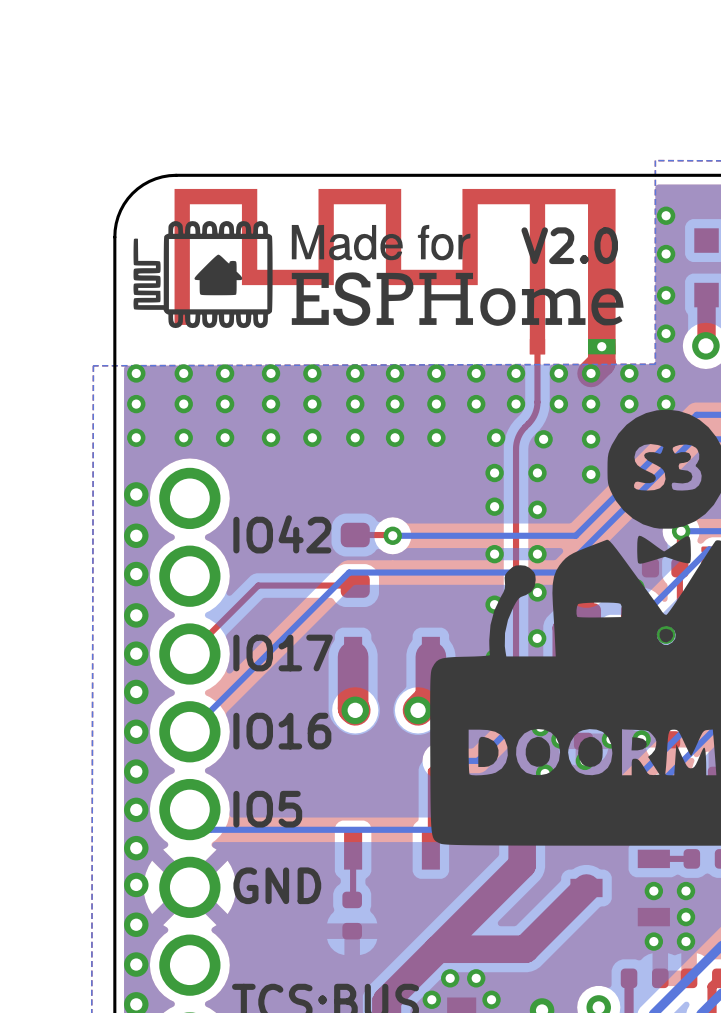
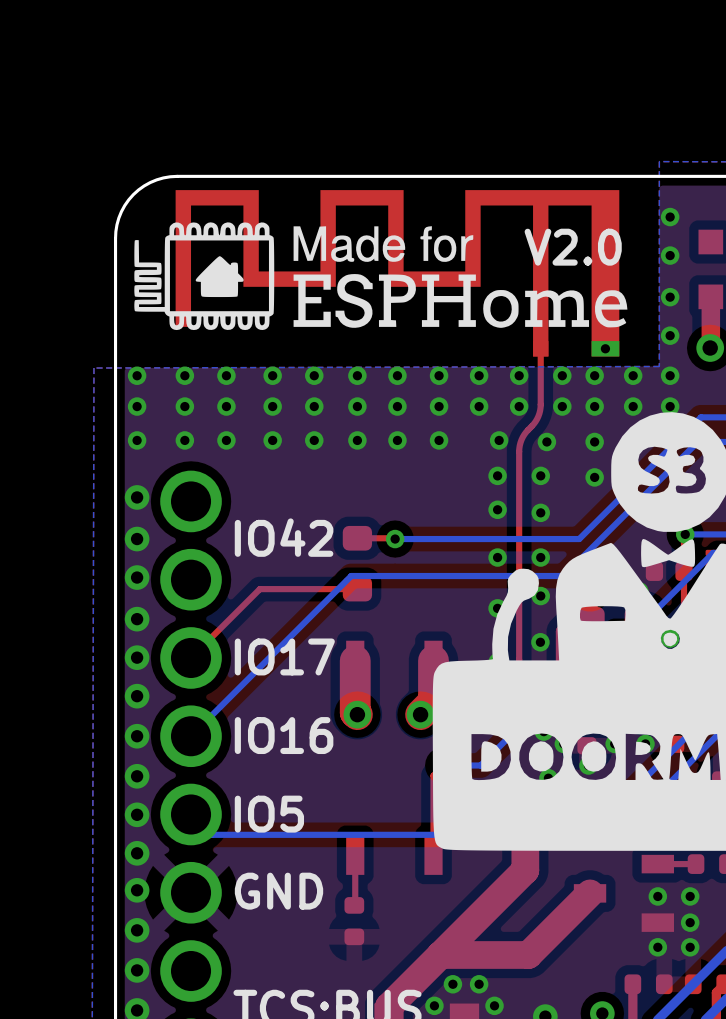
top track: (601, 346) (601, 362) (591, 373) -> none

